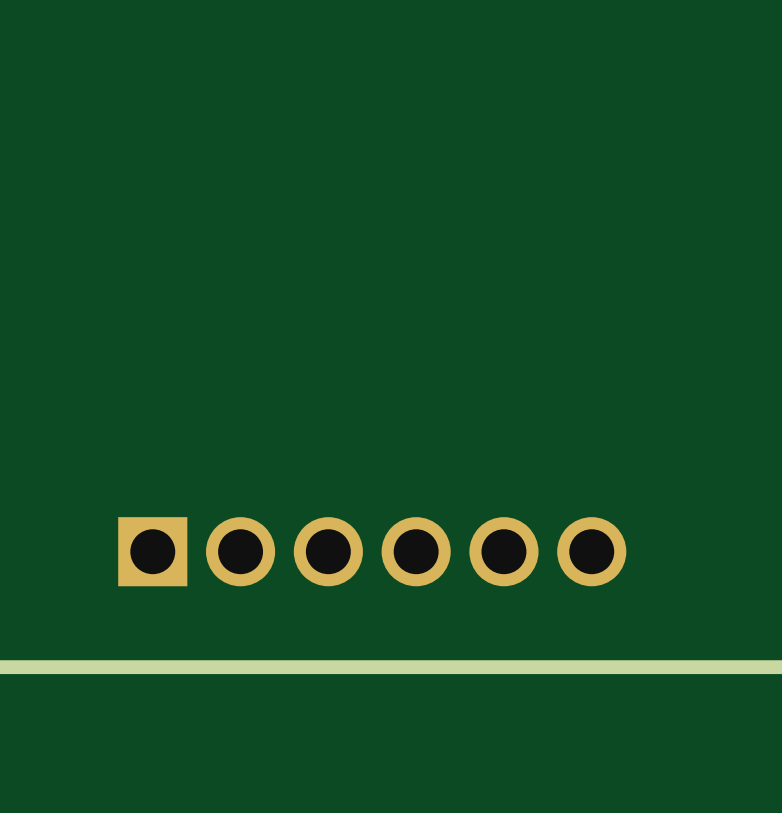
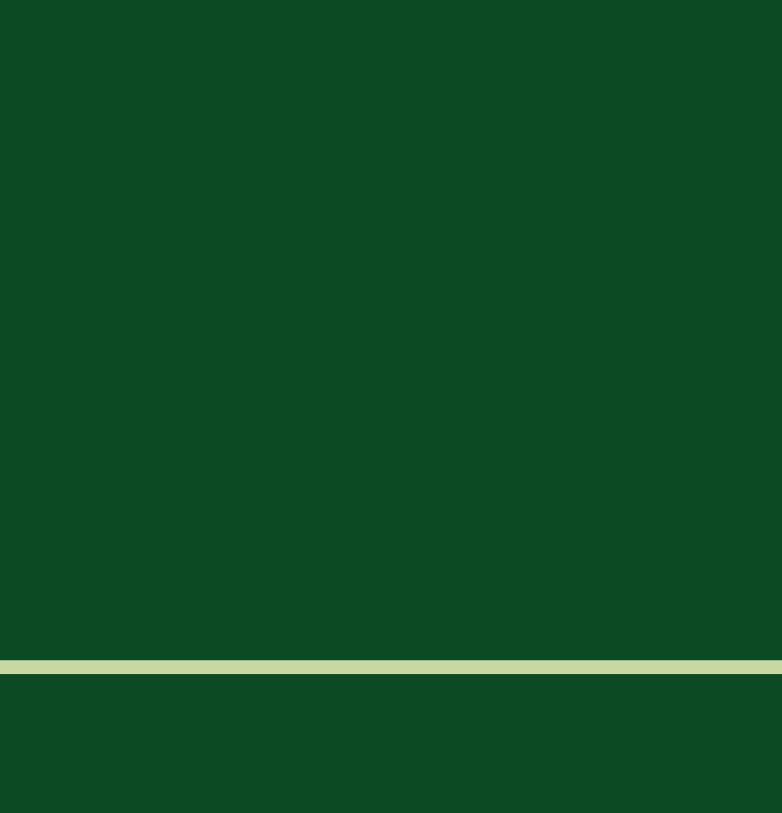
part: (372, 551) -> none

